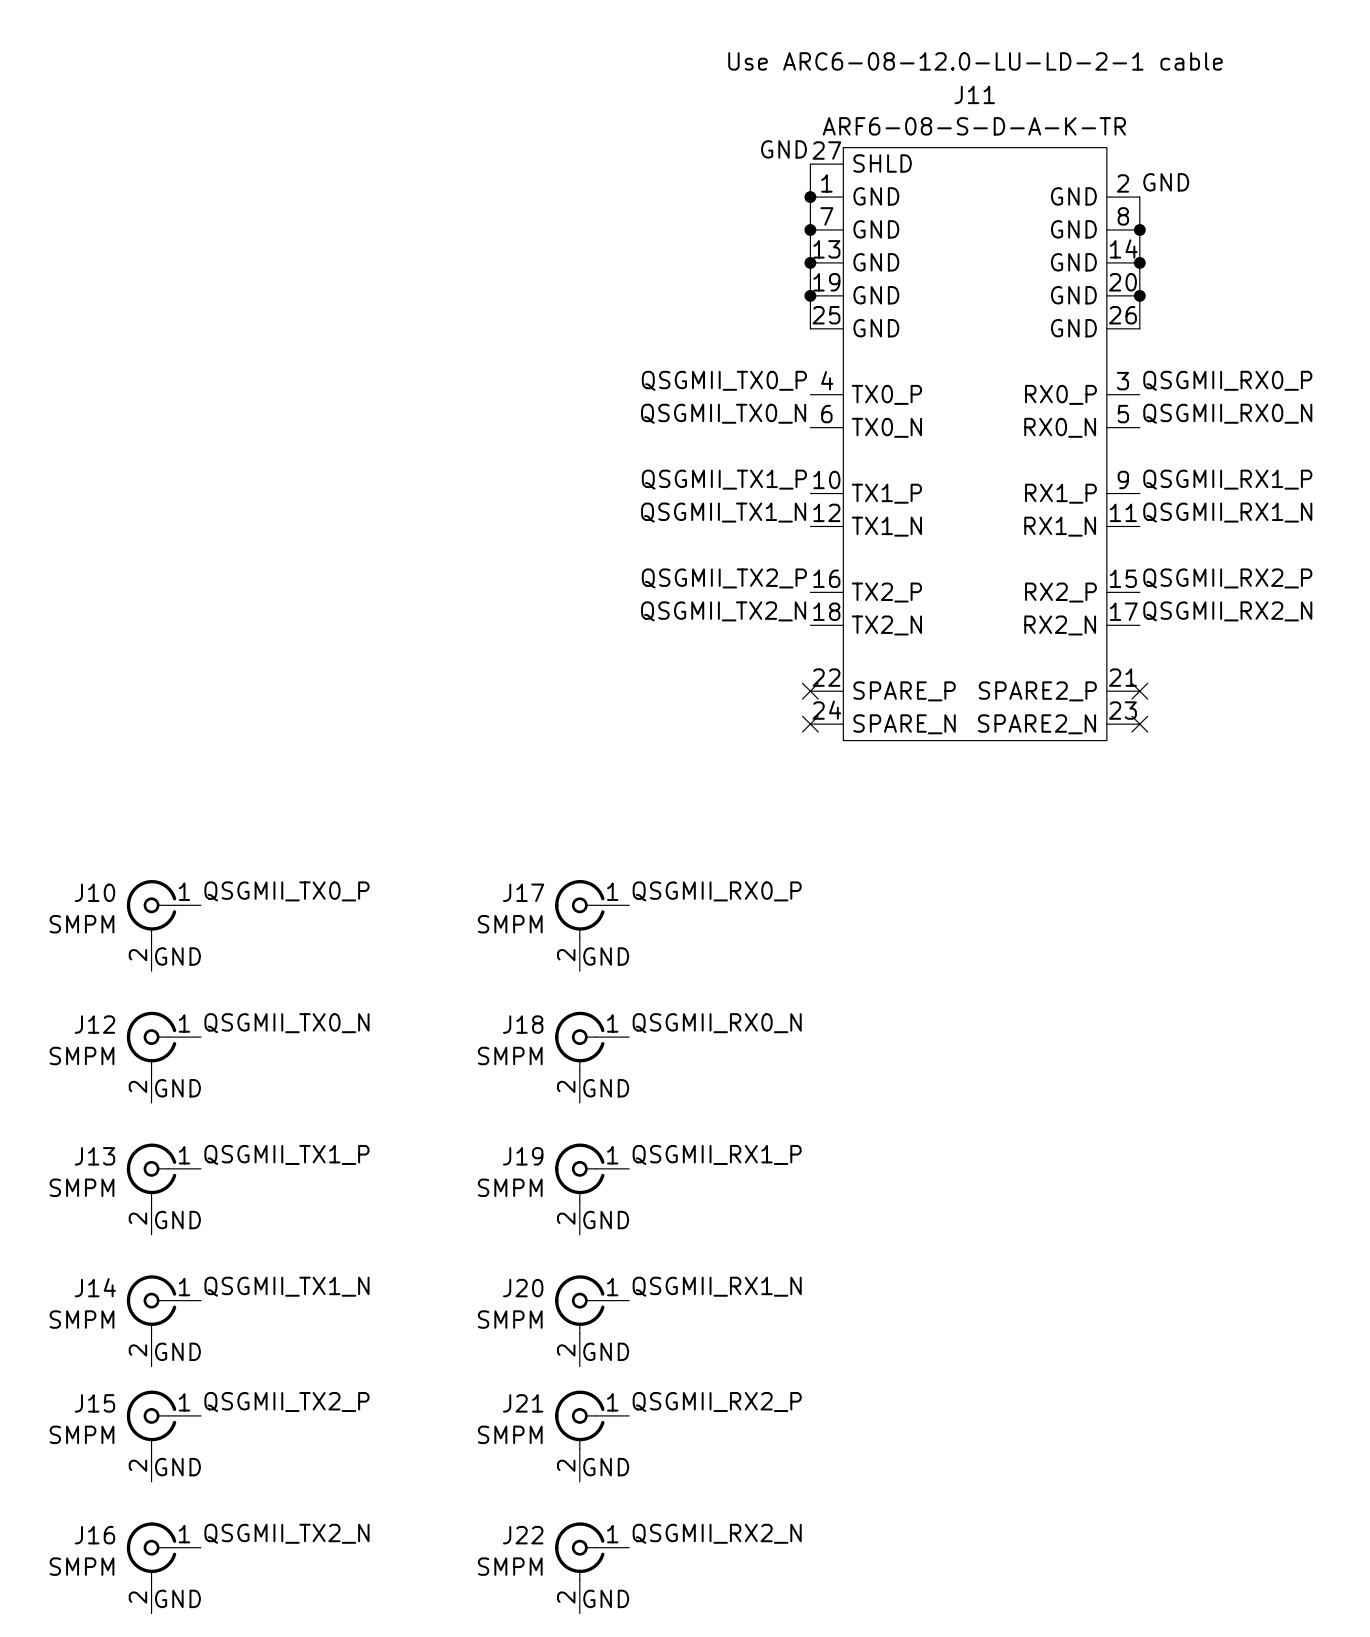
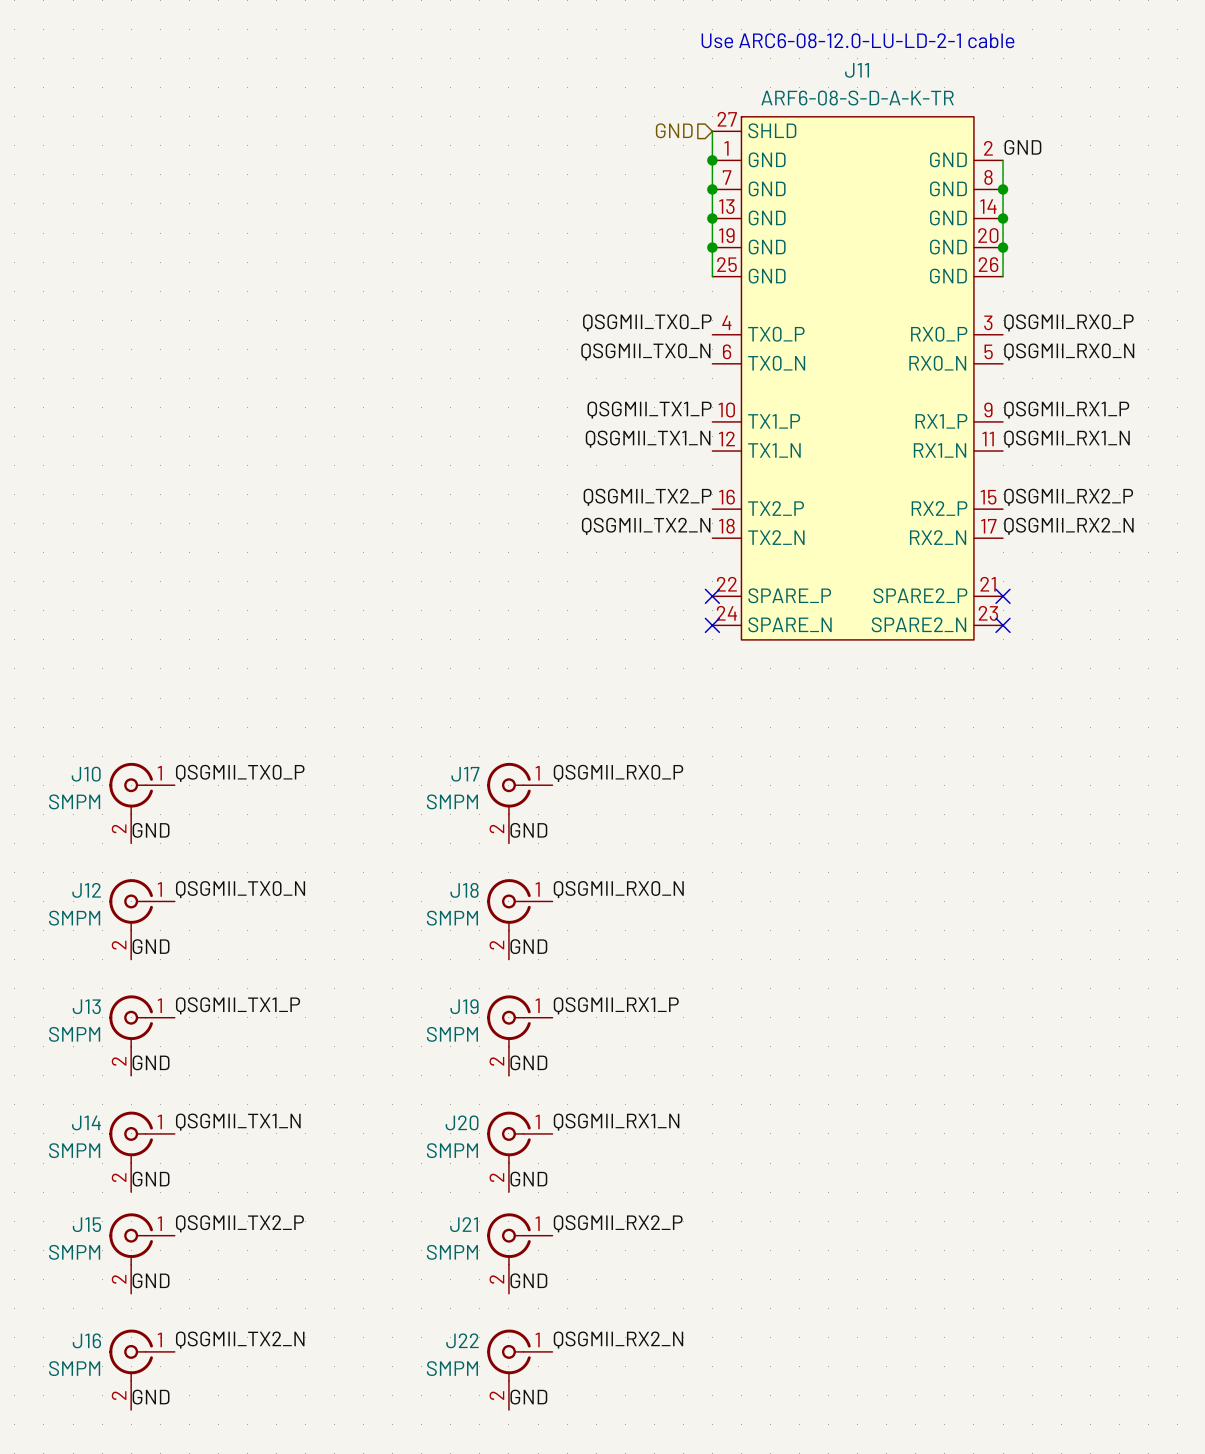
label: GND (783, 149) -> none
hierarchical label: none -> GND (674, 130)

